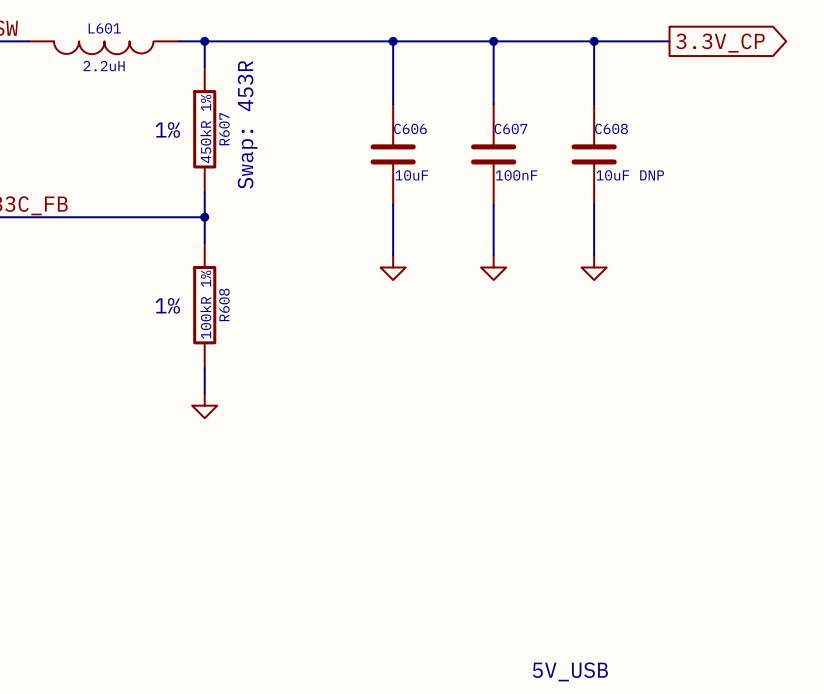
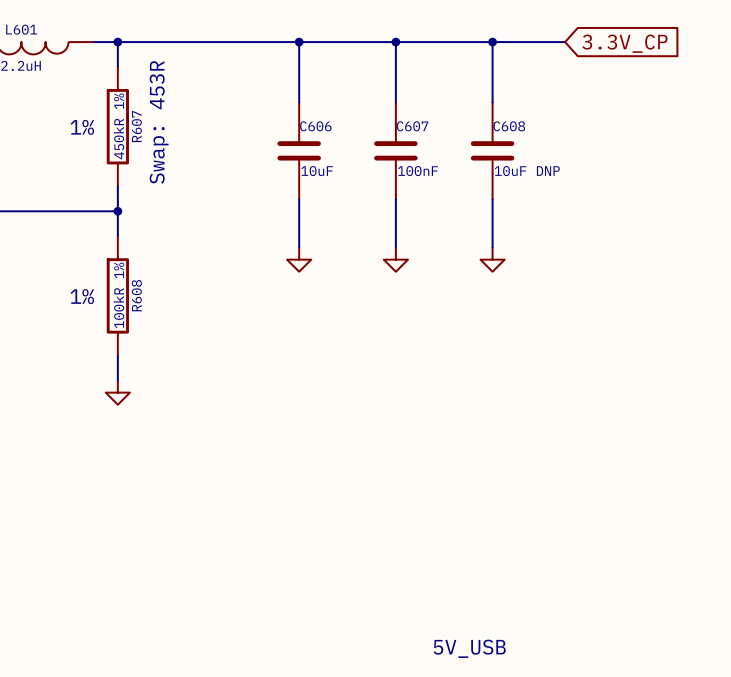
global label shape: output (720, 43) -> input (624, 43)

